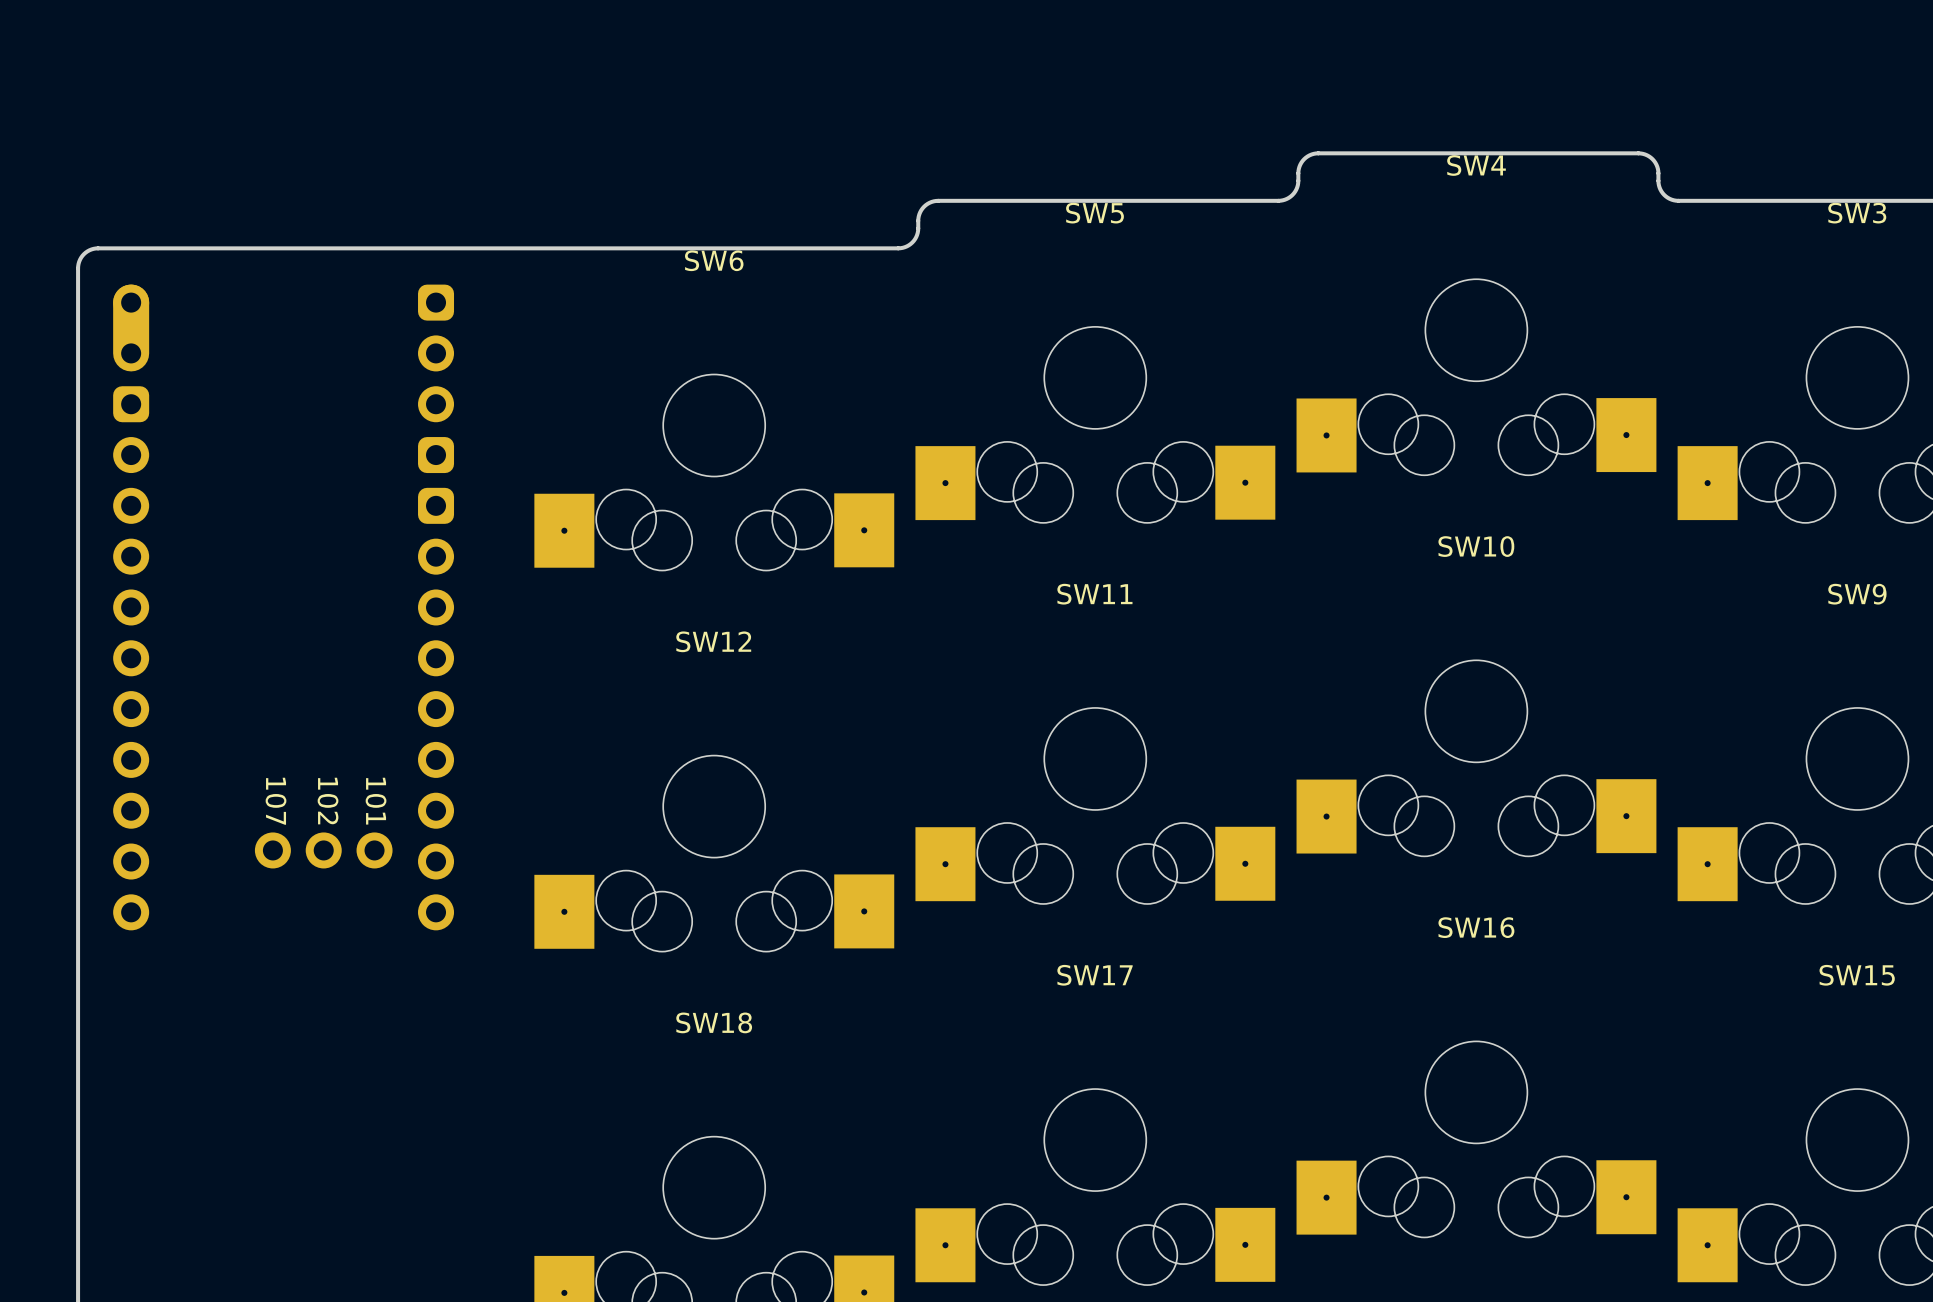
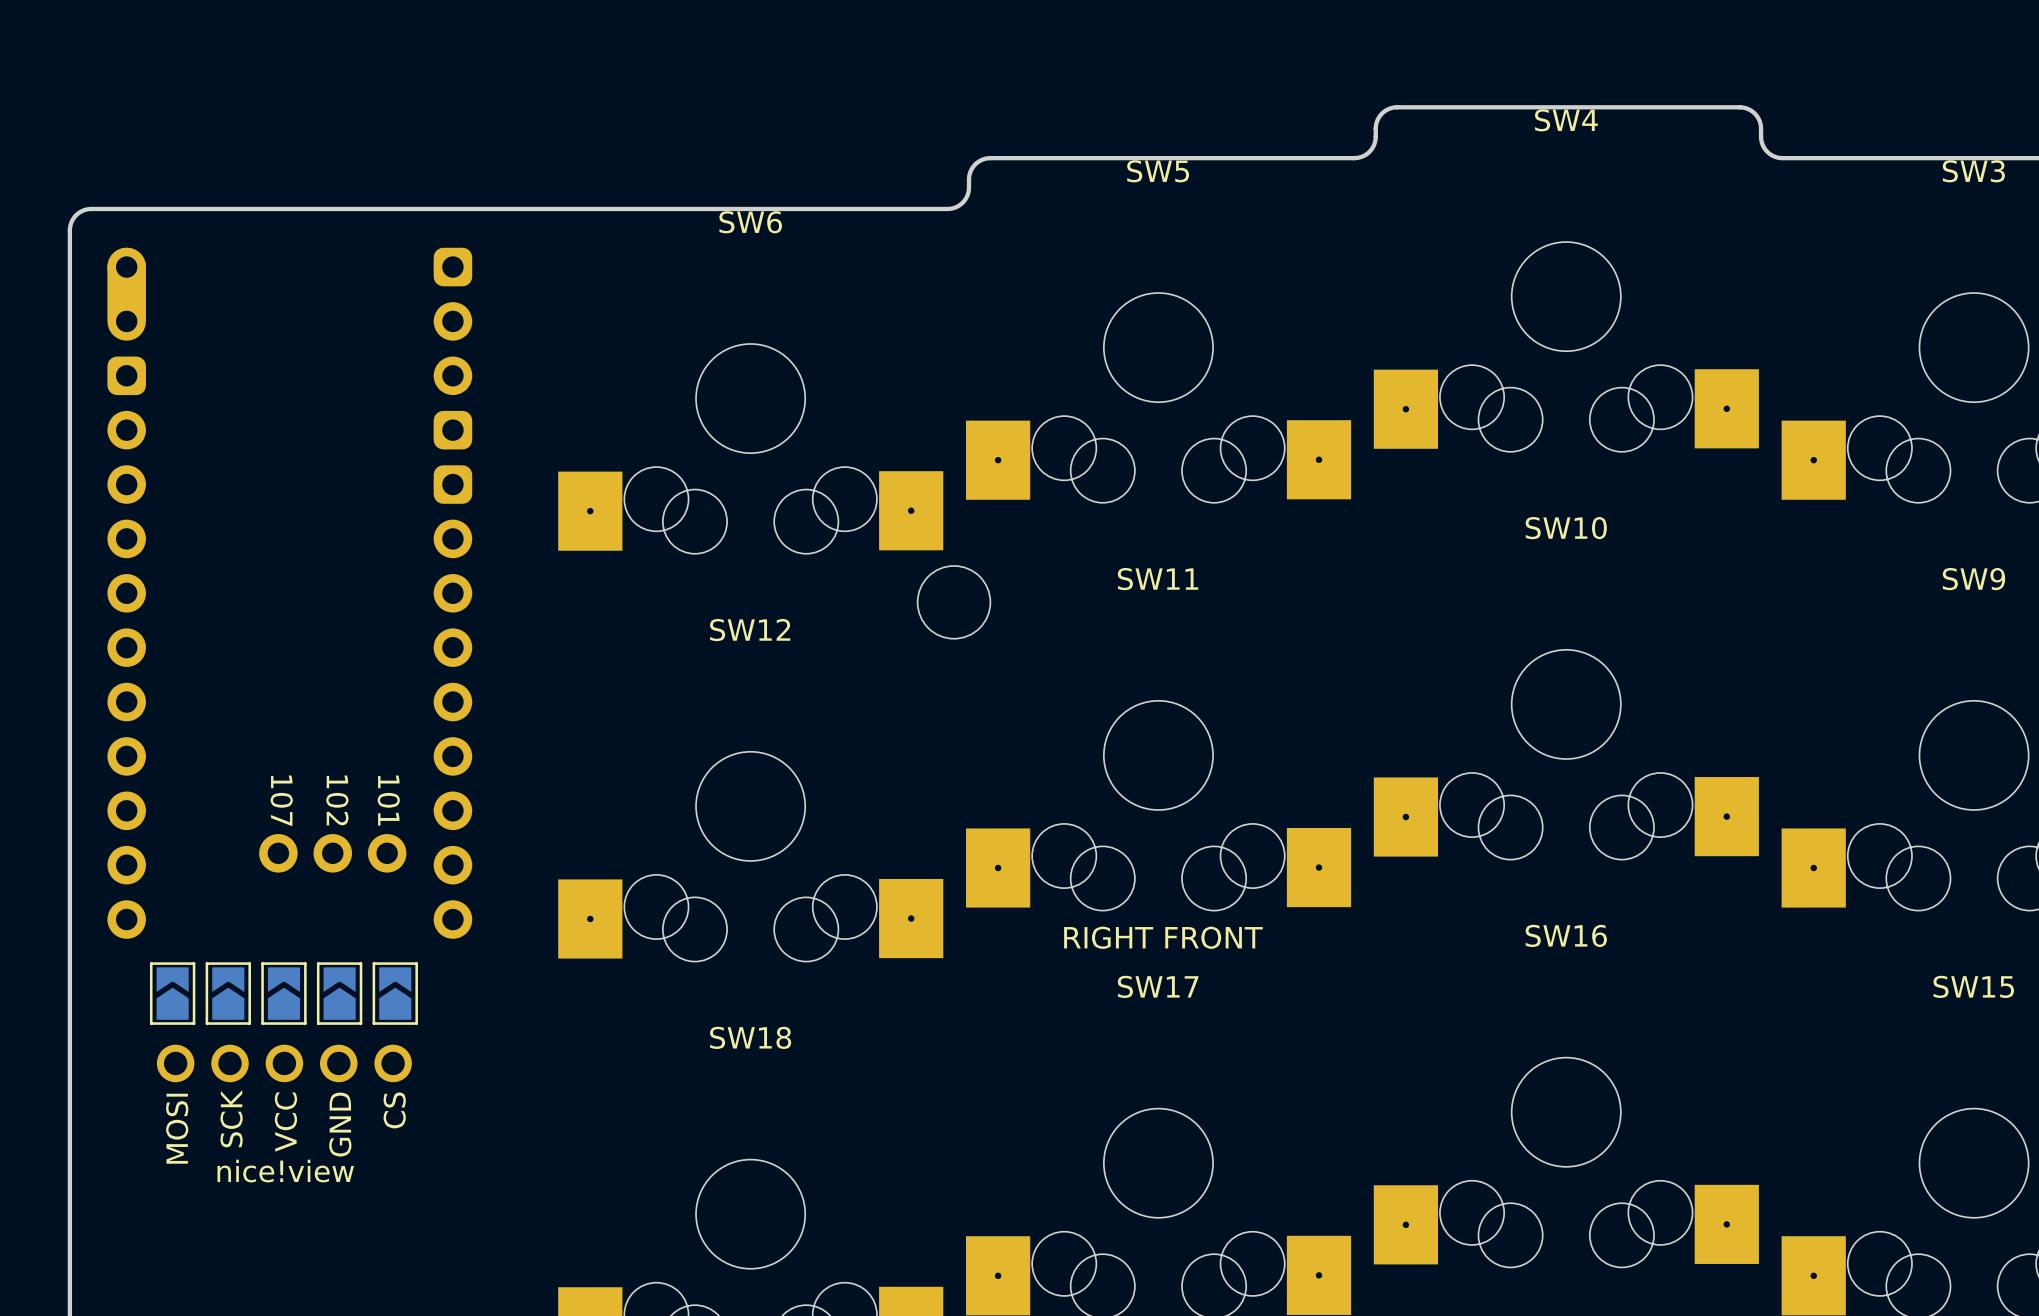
round board edge: none -> [917, 565, 991, 640]
text: none -> RIGHT FRONT (1163, 937)
part: none -> (172, 993)
part: none -> (228, 993)
part: none -> (283, 993)
part: none -> (339, 993)
part: none -> (395, 993)
part: none -> (284, 1063)

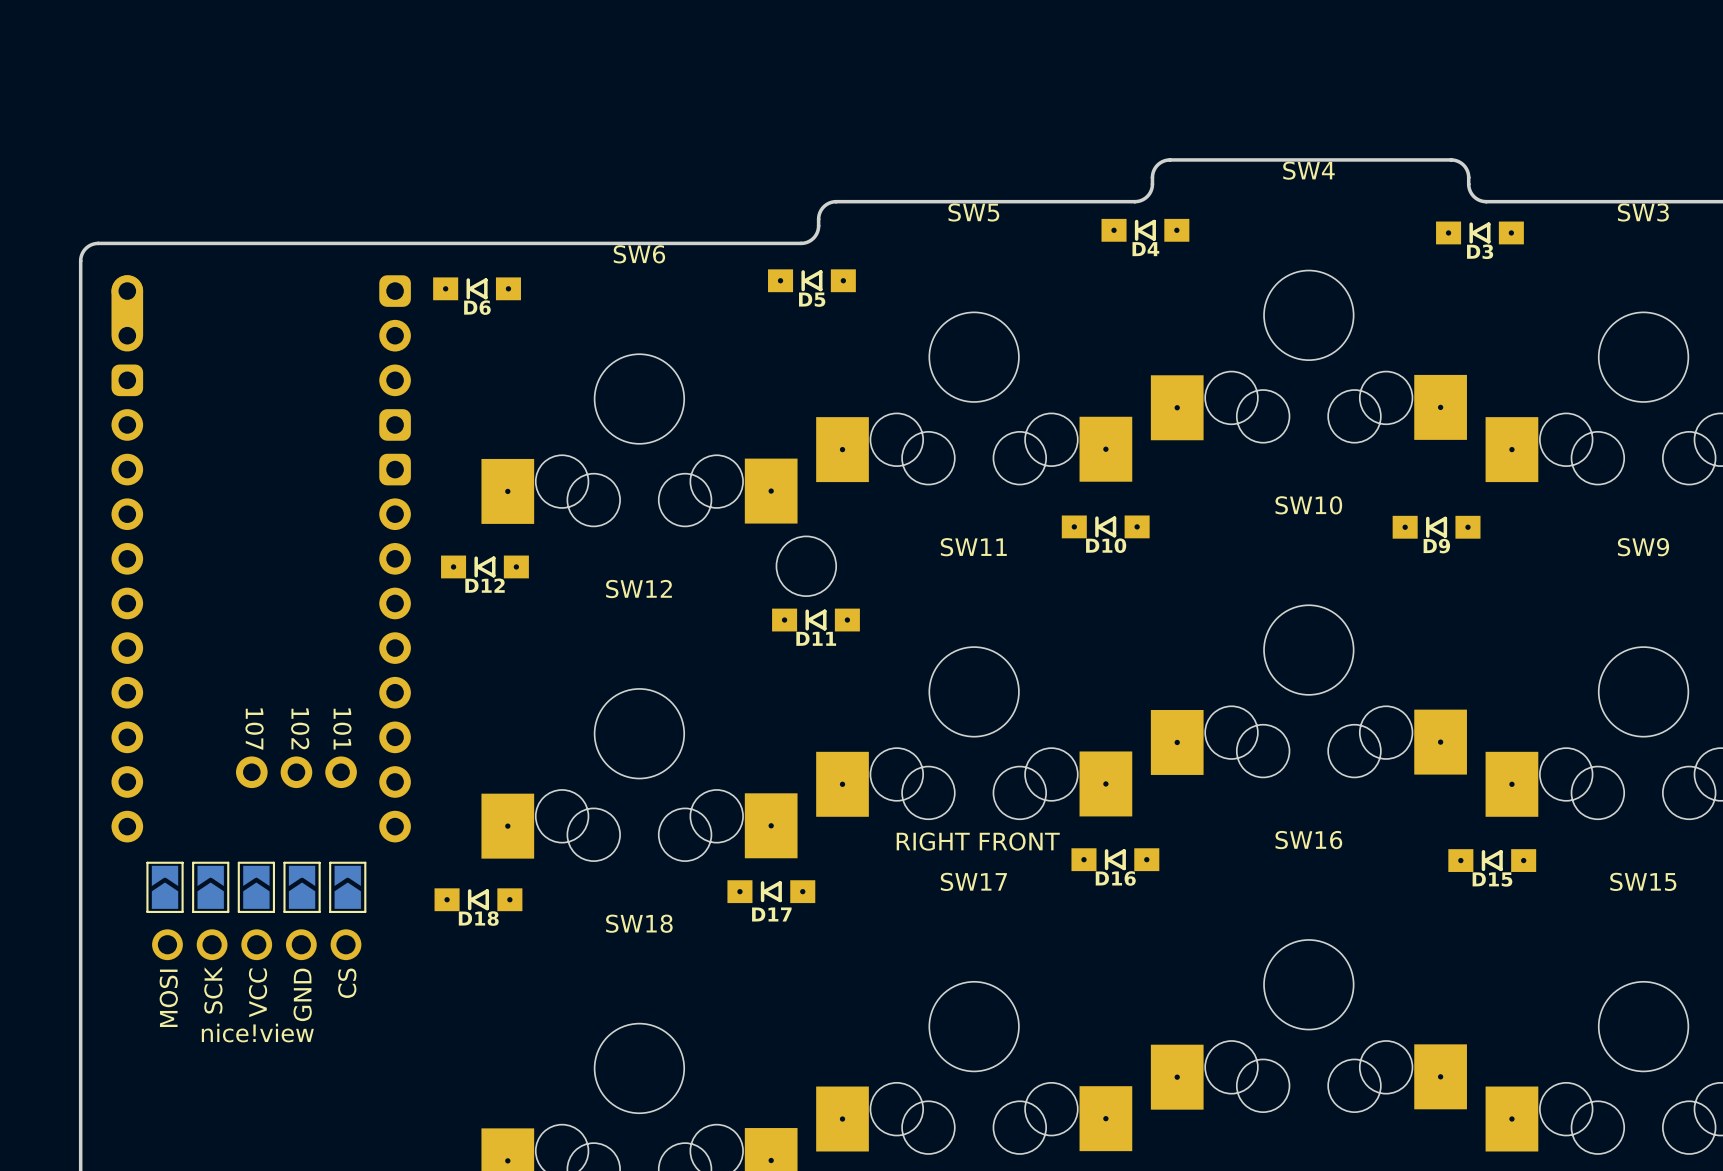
D4: none -> (1145, 230)
D3: none -> (1479, 232)
D5: none -> (811, 280)
D6: none -> (477, 288)
D10: none -> (1105, 526)
D9: none -> (1436, 527)
D12: none -> (484, 566)
D11: none -> (815, 620)
D16: none -> (1115, 859)
D15: none -> (1492, 860)
D17: none -> (771, 891)
D18: none -> (478, 899)

